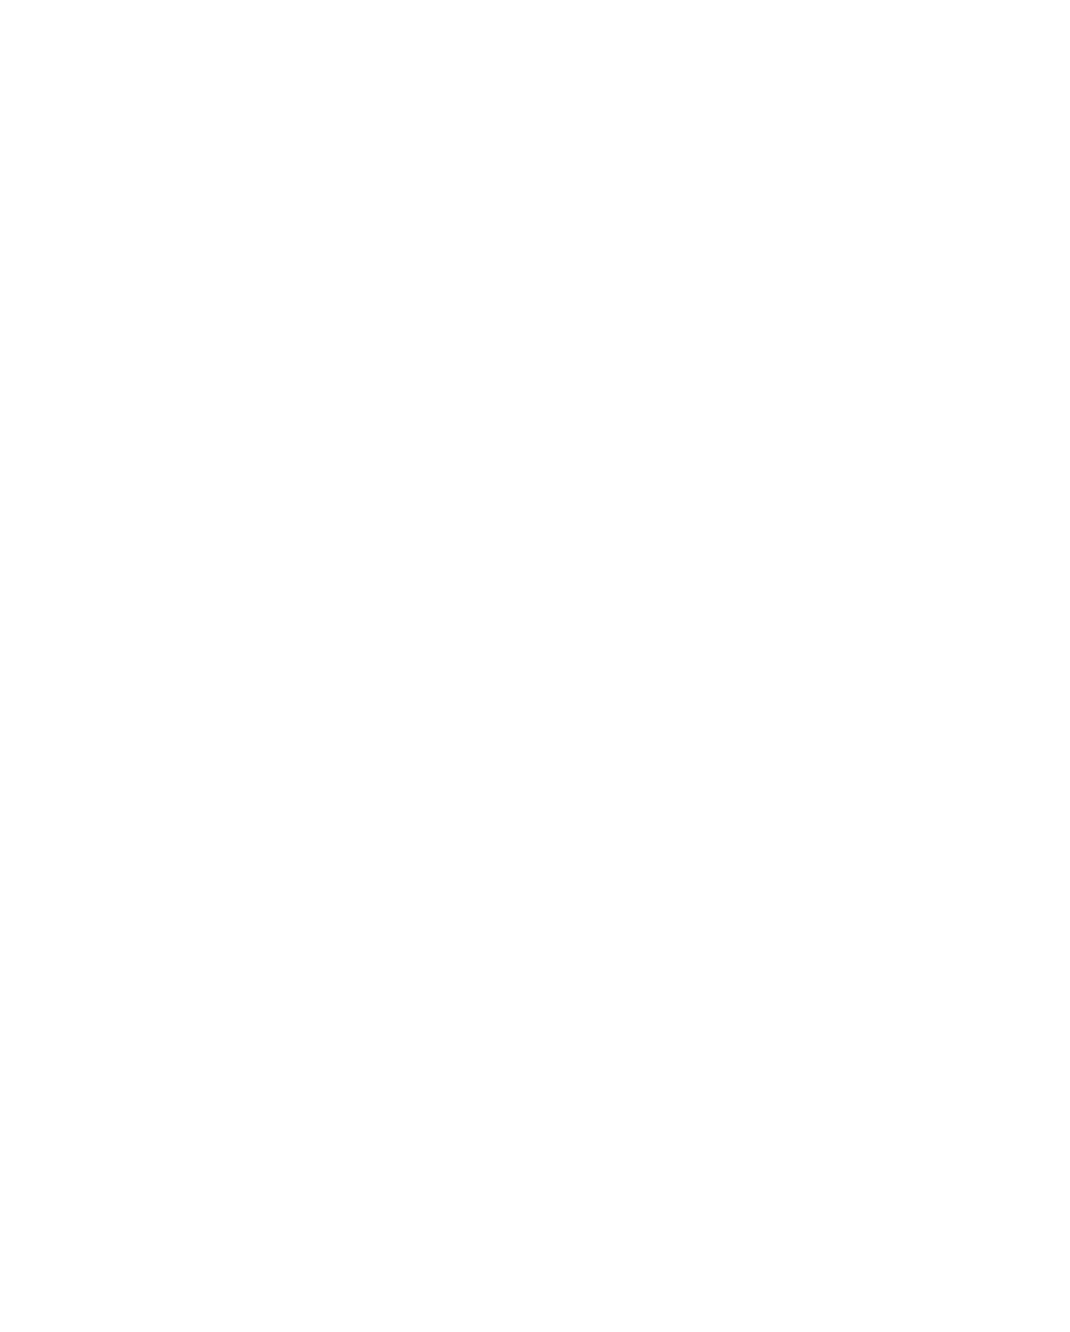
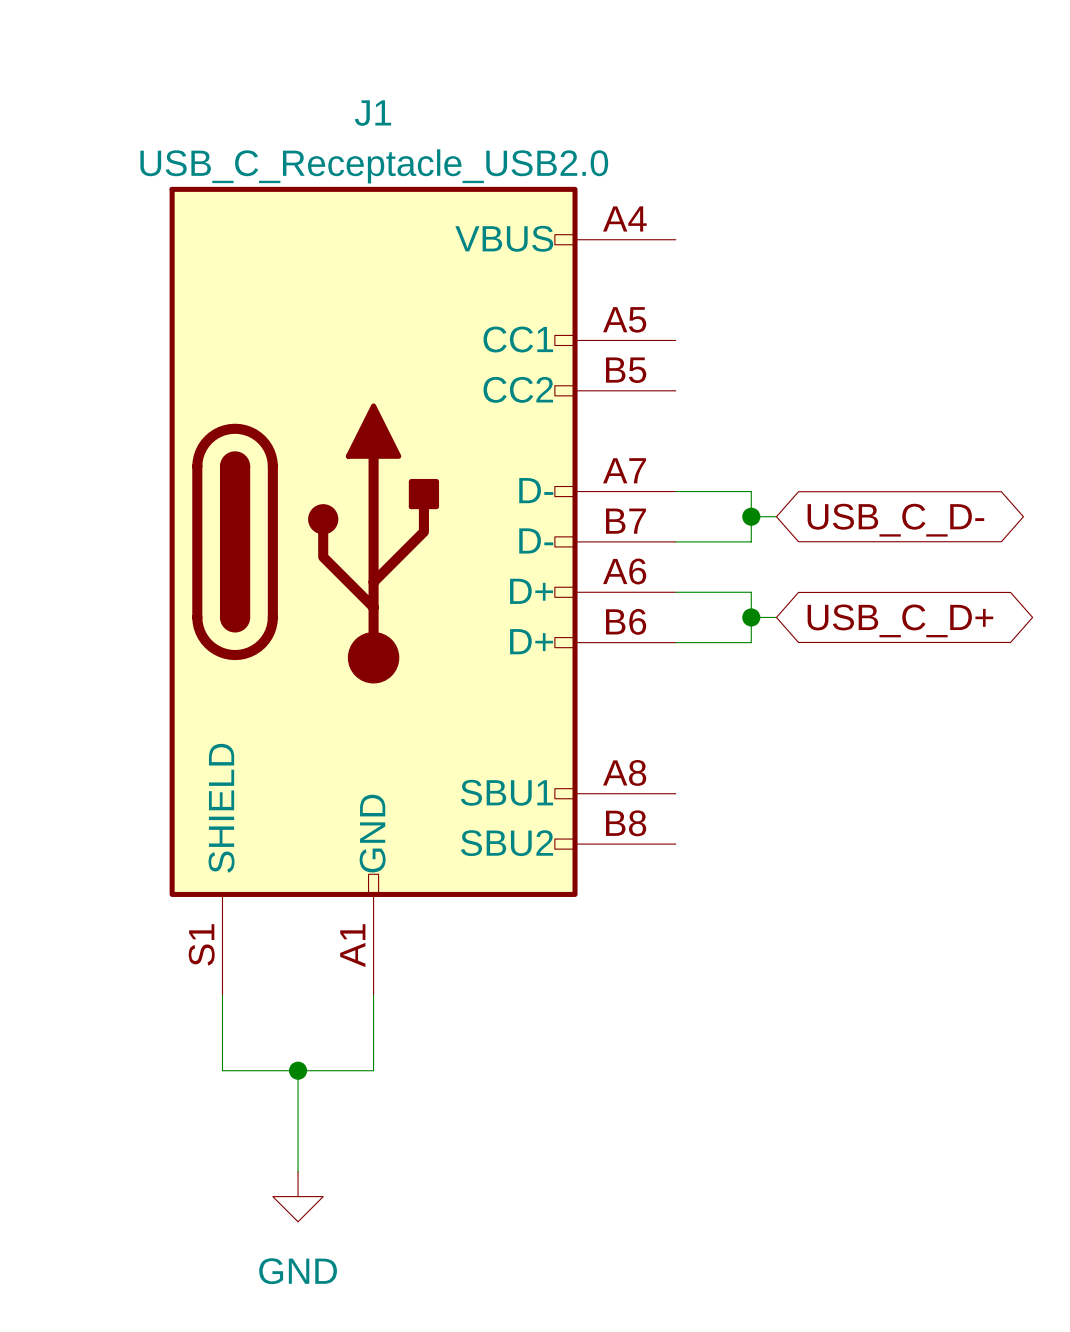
wire: none -> (675, 491) (751, 491) (751, 541) (675, 541)
wire: none -> (751, 516) (776, 516)
junction: none -> (751, 516)
global label: none -> USB_C_D- (895, 520)
J1: none -> USB_C_Receptacle_USB2.0 (422, 591)
wire: none -> (675, 592) (751, 592) (751, 642) (675, 642)
wire: none -> (751, 617) (776, 617)
junction: none -> (751, 617)
global label: none -> USB_C_D+ (900, 620)
wire: none -> (222, 995) (222, 1070) (373, 1070) (373, 995)
wire: none -> (298, 1070) (298, 1171)
junction: none -> (298, 1070)
power symbol: none -> GND (298, 1196)

